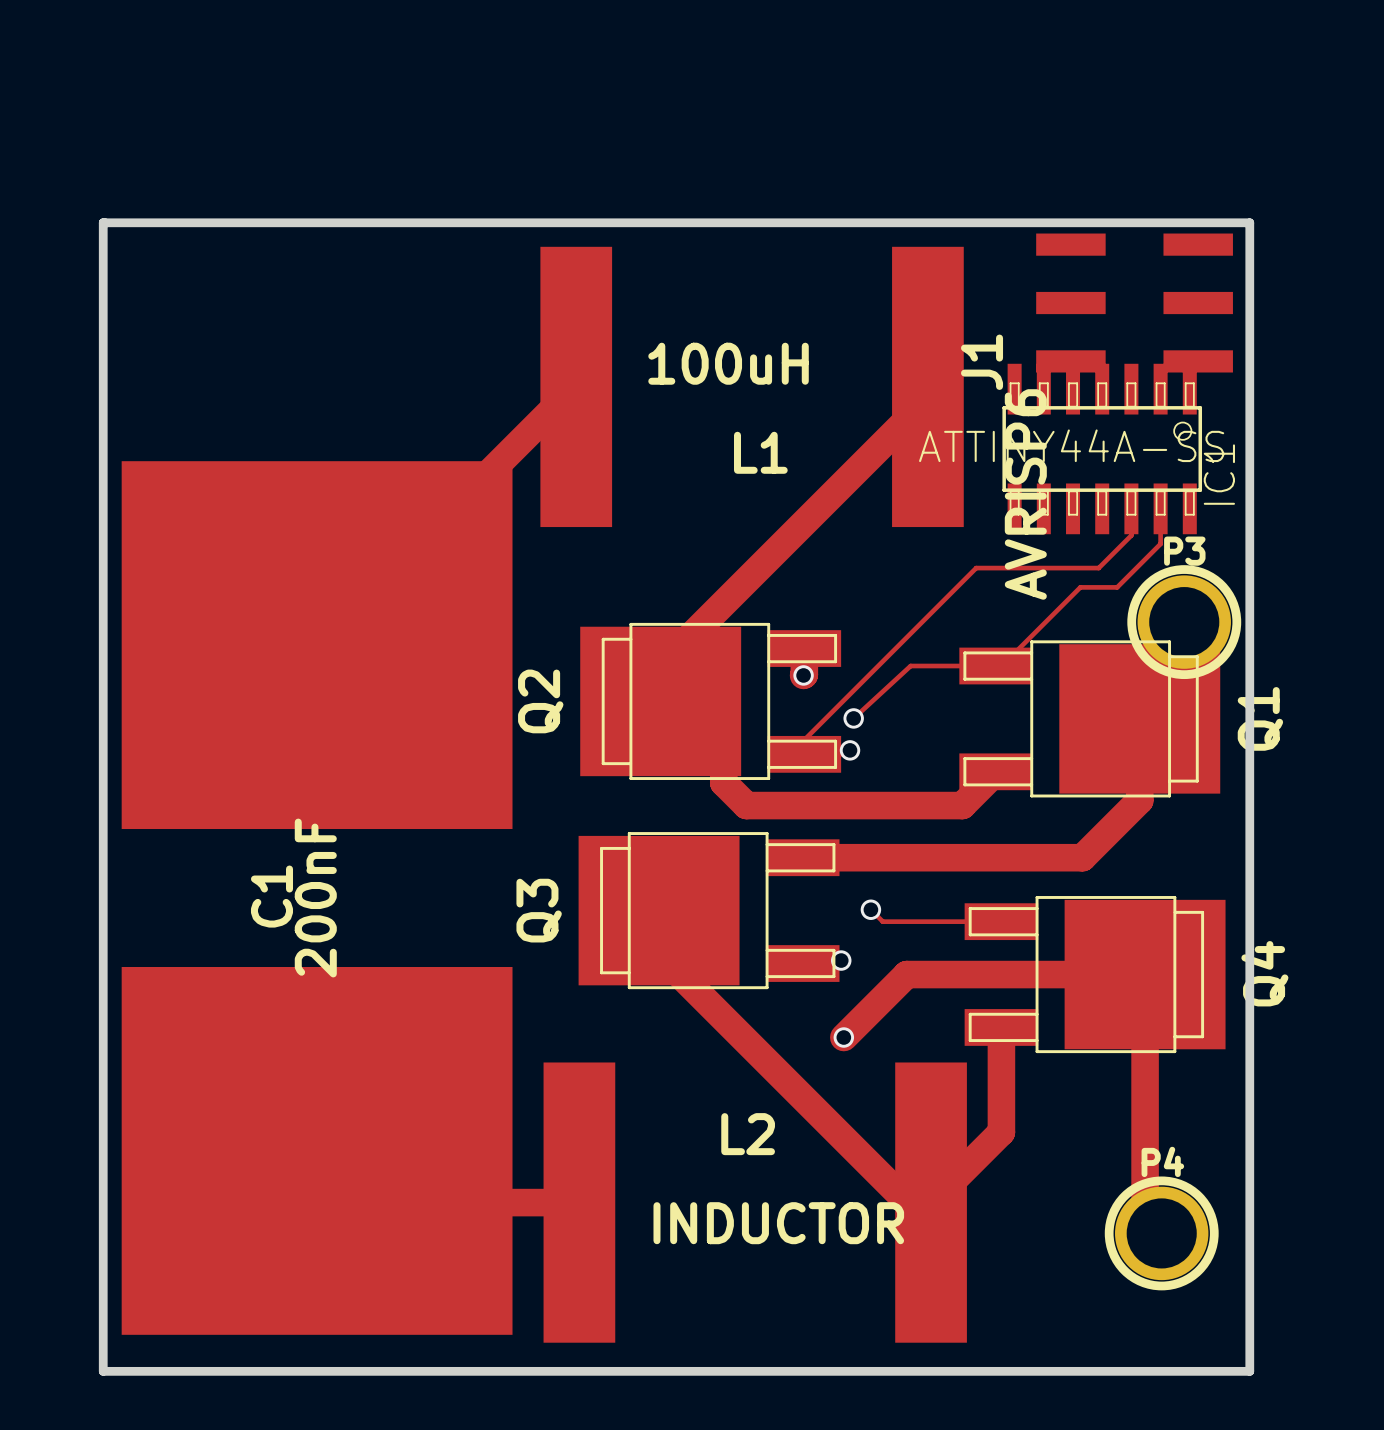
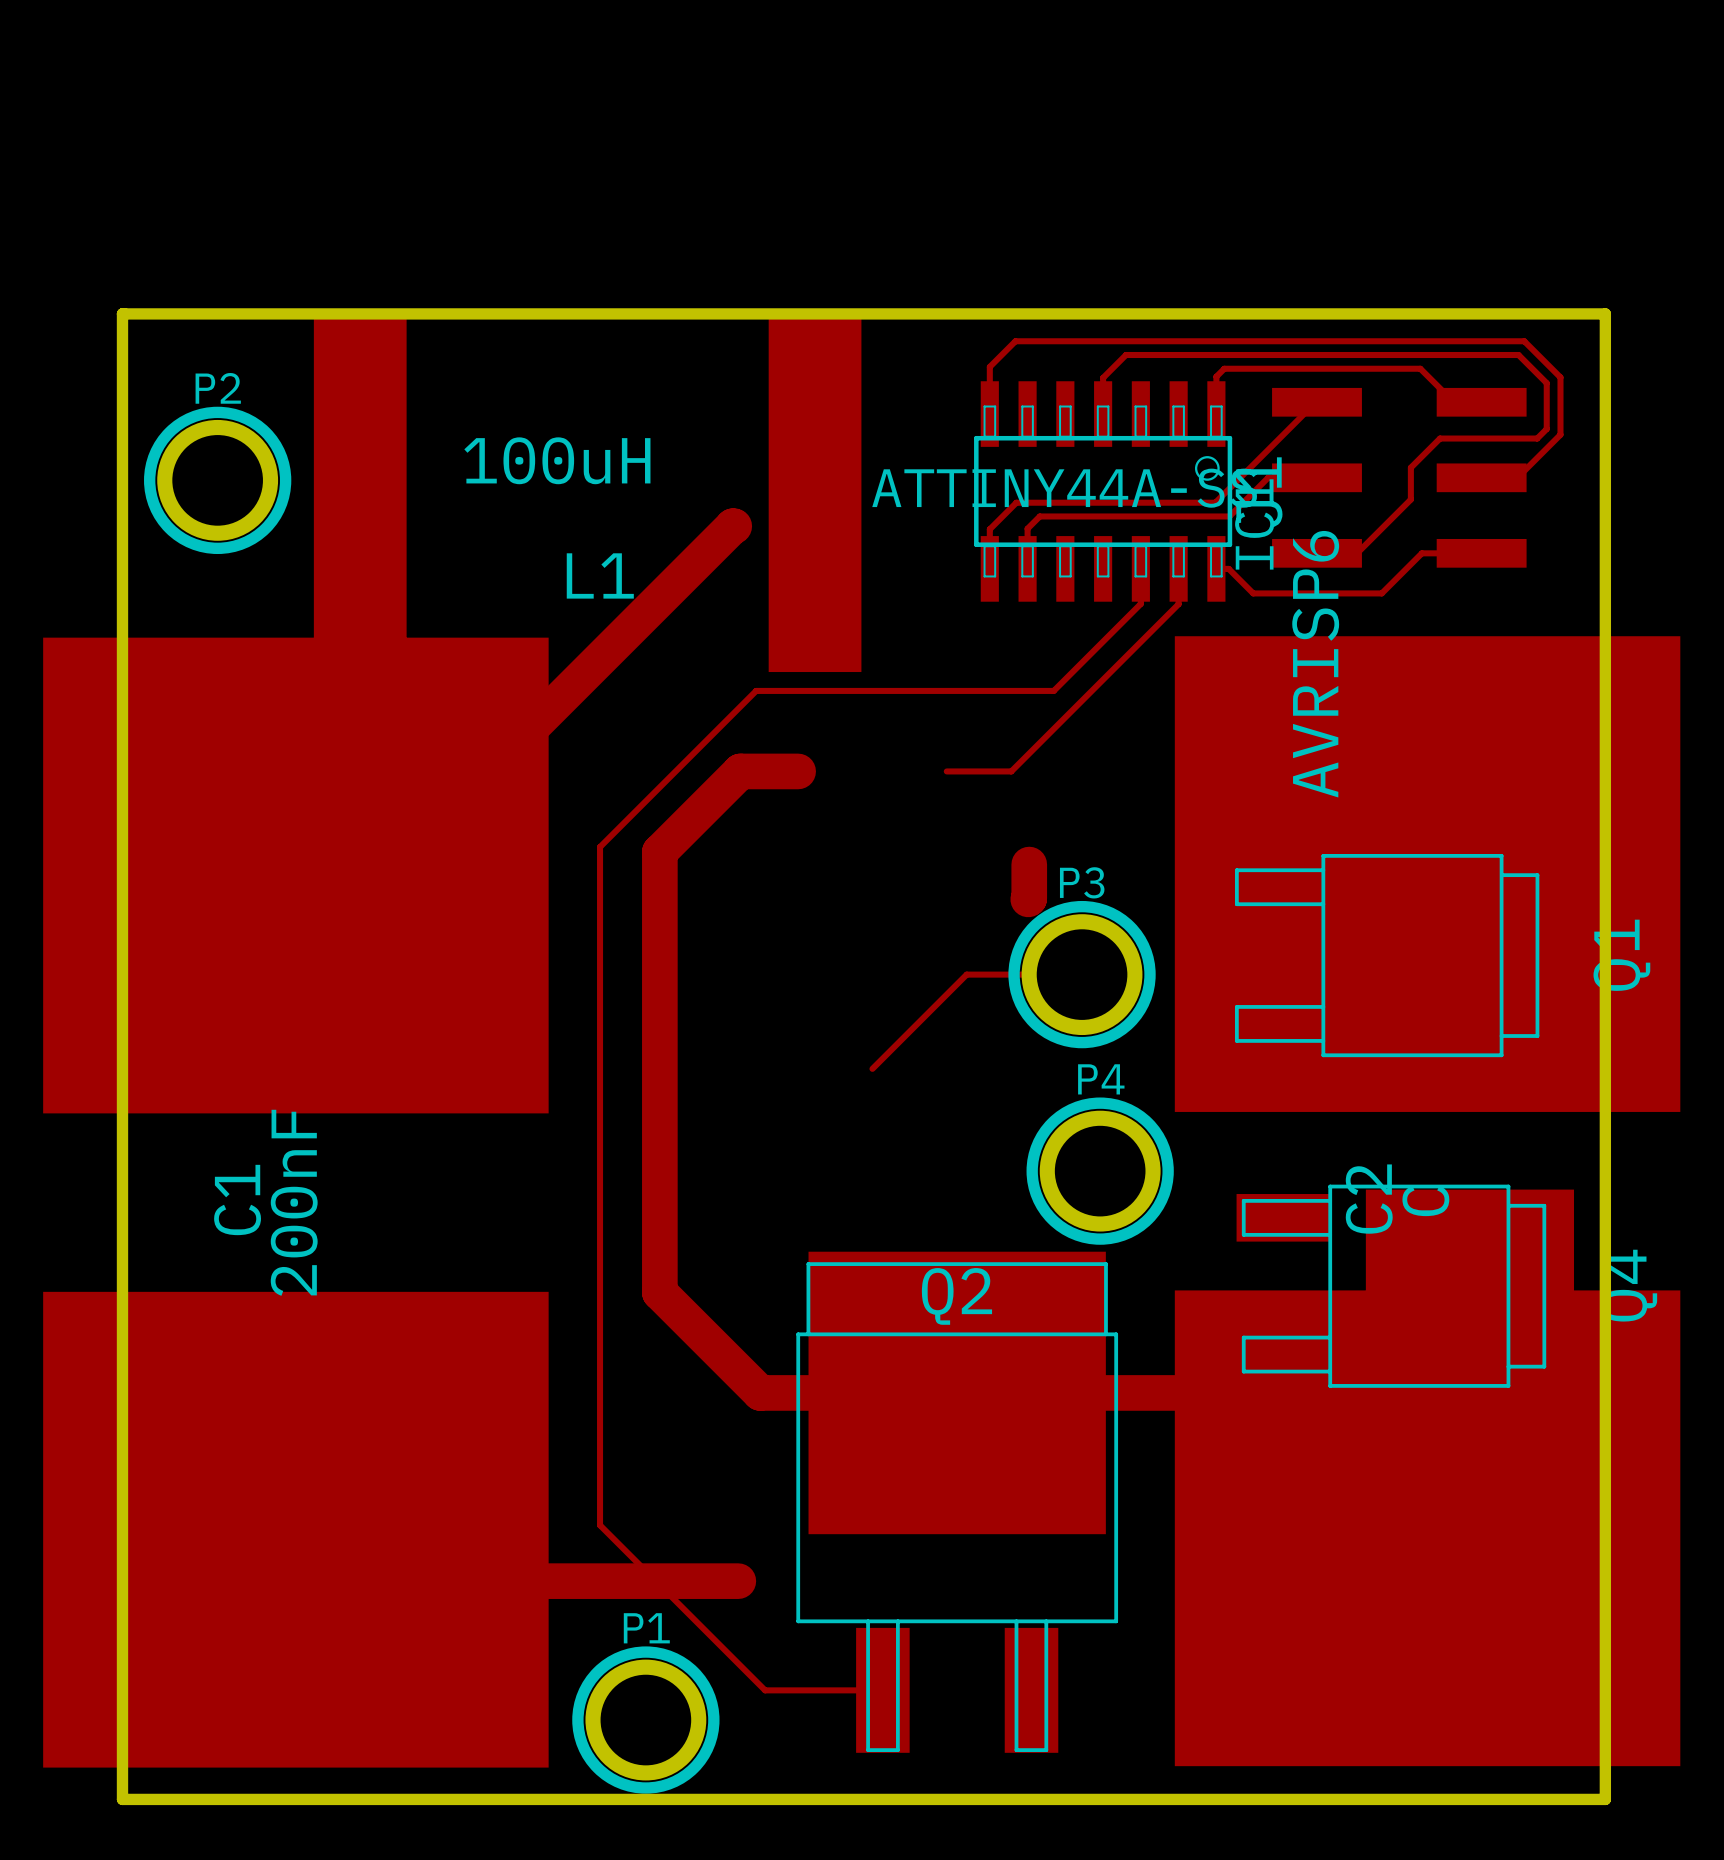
track: none -> (1317, 402) (1215, 502) (1016, 502) (989, 529) (989, 568)
track: none -> (1481, 402) (1453, 402) (1420, 368) (1224, 368) (1216, 376) (1216, 414)
track: none -> (989, 414) (989, 366) (1015, 341) (1524, 341) (1560, 377) (1560, 434) (1517, 477) (1481, 477)
track: none -> (1103, 414) (1103, 377) (1125, 355) (1518, 355) (1546, 383) (1546, 429) (1537, 438) (1440, 438) (1410, 467) (1410, 499) (1357, 553) (1317, 553)
J1 position: (1134, 303) -> (1399, 477)
track: none -> (1317, 477) (1268, 477) (1229, 516) (1039, 516) (1027, 528) (1027, 568)
P2: none -> (217, 480)
L1 position: (752, 386) -> (587, 490)
track: (927, 386) (927, 399) (660, 666) (660, 701) (723, 764) (723, 782) (746, 805) (962, 805) (996, 771) -> none
track: none -> (1481, 553) (1421, 553) (1381, 593) (1253, 593) (1228, 568) (1216, 568)
track: none -> (1140, 568) (1140, 603) (1053, 690) (756, 690) (600, 847) (600, 1525) (765, 1690) (882, 1690)
track: none -> (1178, 568) (1178, 604) (1011, 771) (946, 771)
IC1 position: (1102, 449) -> (1103, 491)
track: (1131, 508) (1131, 535) (1098, 568) (976, 568) (804, 739) (804, 754) (846, 754) (850, 750) -> none
track: (1160, 508) (1160, 543) (1117, 587) (1080, 587) (1001, 666) (910, 666) (853, 718) -> none
track: none -> (798, 771) (740, 771) (659, 852) (659, 1292) (760, 1392) (1292, 1392) (1427, 1528)
Q2 footprint: [580, 622, 842, 780] -> [796, 1251, 1119, 1753]
track: (1184, 622) (1184, 674) (1139, 718) (1139, 800) (1082, 857) (802, 857) -> none
P3 position: (1184, 622) -> (1082, 974)
via: (803, 675) -> none
Q2 name position: Q2 (540, 701) -> Q2 (956, 1296)
via: (853, 718) -> none
track: none -> (1082, 974) (966, 974) (872, 1068)
via: (850, 750) -> none
C1 position: (317, 898) -> (295, 1202)
C2: none -> C (1427, 1201)
track: (870, 909) (882, 921) (1001, 921) -> none
via: (870, 909) -> none
track: (659, 910) (659, 953) (907, 1202) (931, 1202) (1001, 1132) (1001, 1027) -> none
Q3: (709, 910) -> none
via: (841, 960) -> none
track: (843, 1037) (906, 974) (1145, 974) (1145, 1216) (1161, 1233) -> none
via: (843, 1037) -> none
L2: INDUCTOR (755, 1202) -> none
P4 position: (1161, 1233) -> (1100, 1171)
P1: none -> (645, 1720)

